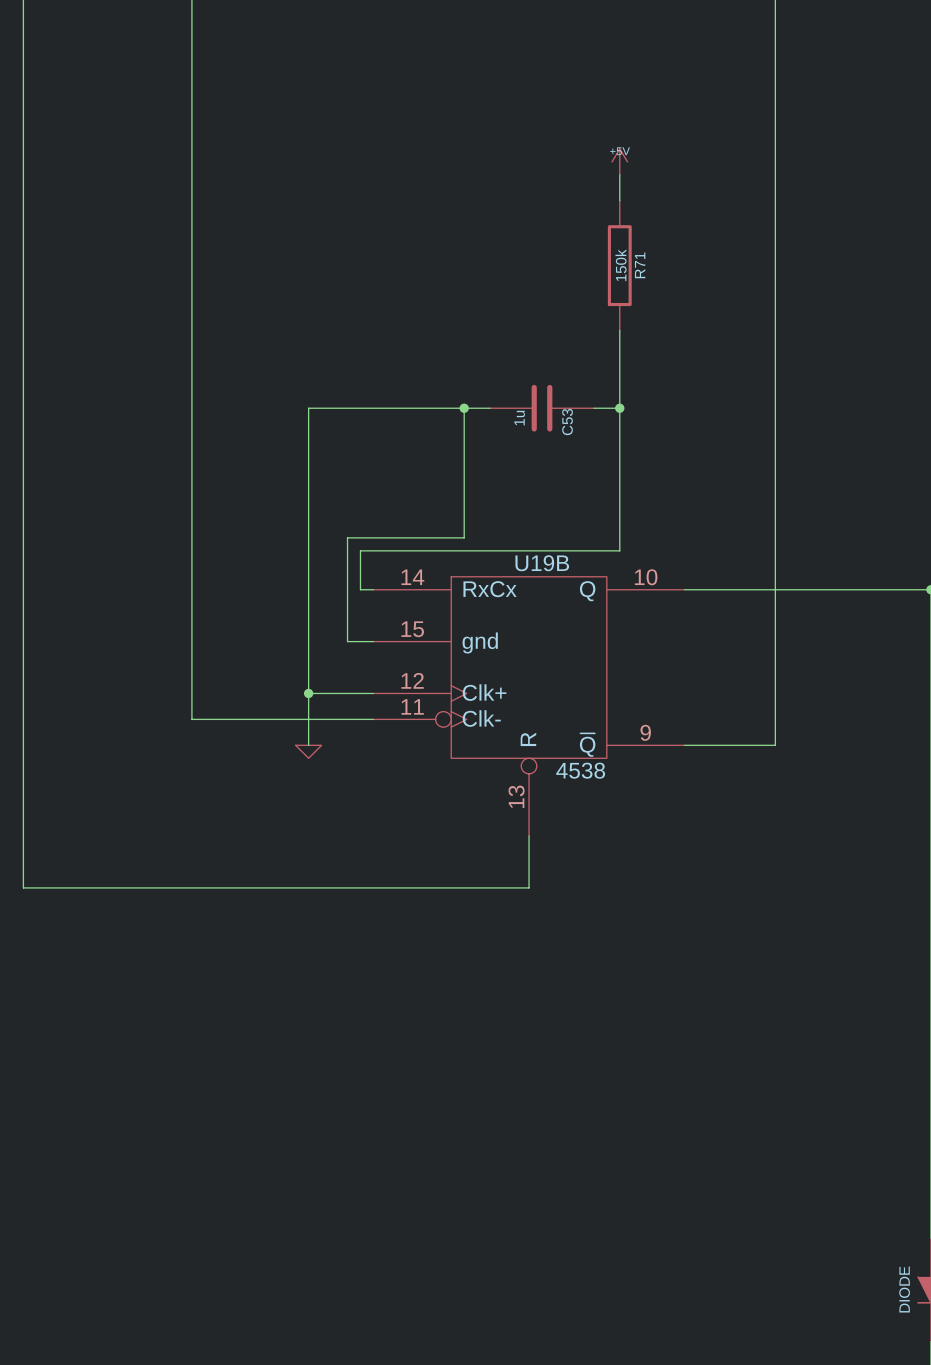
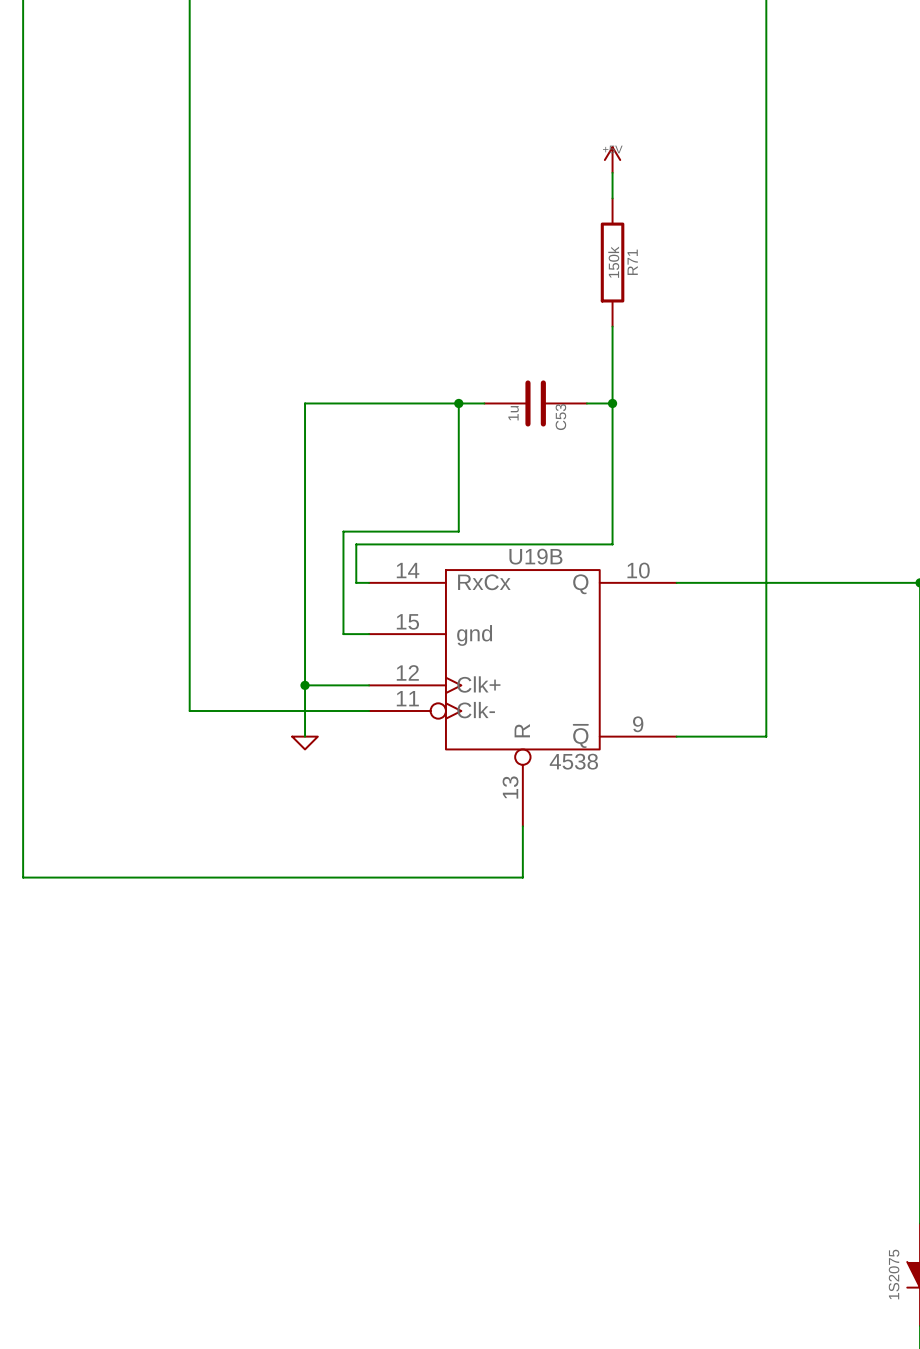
part value: DIODE (904, 1289) -> 1S2075 (894, 1274)

